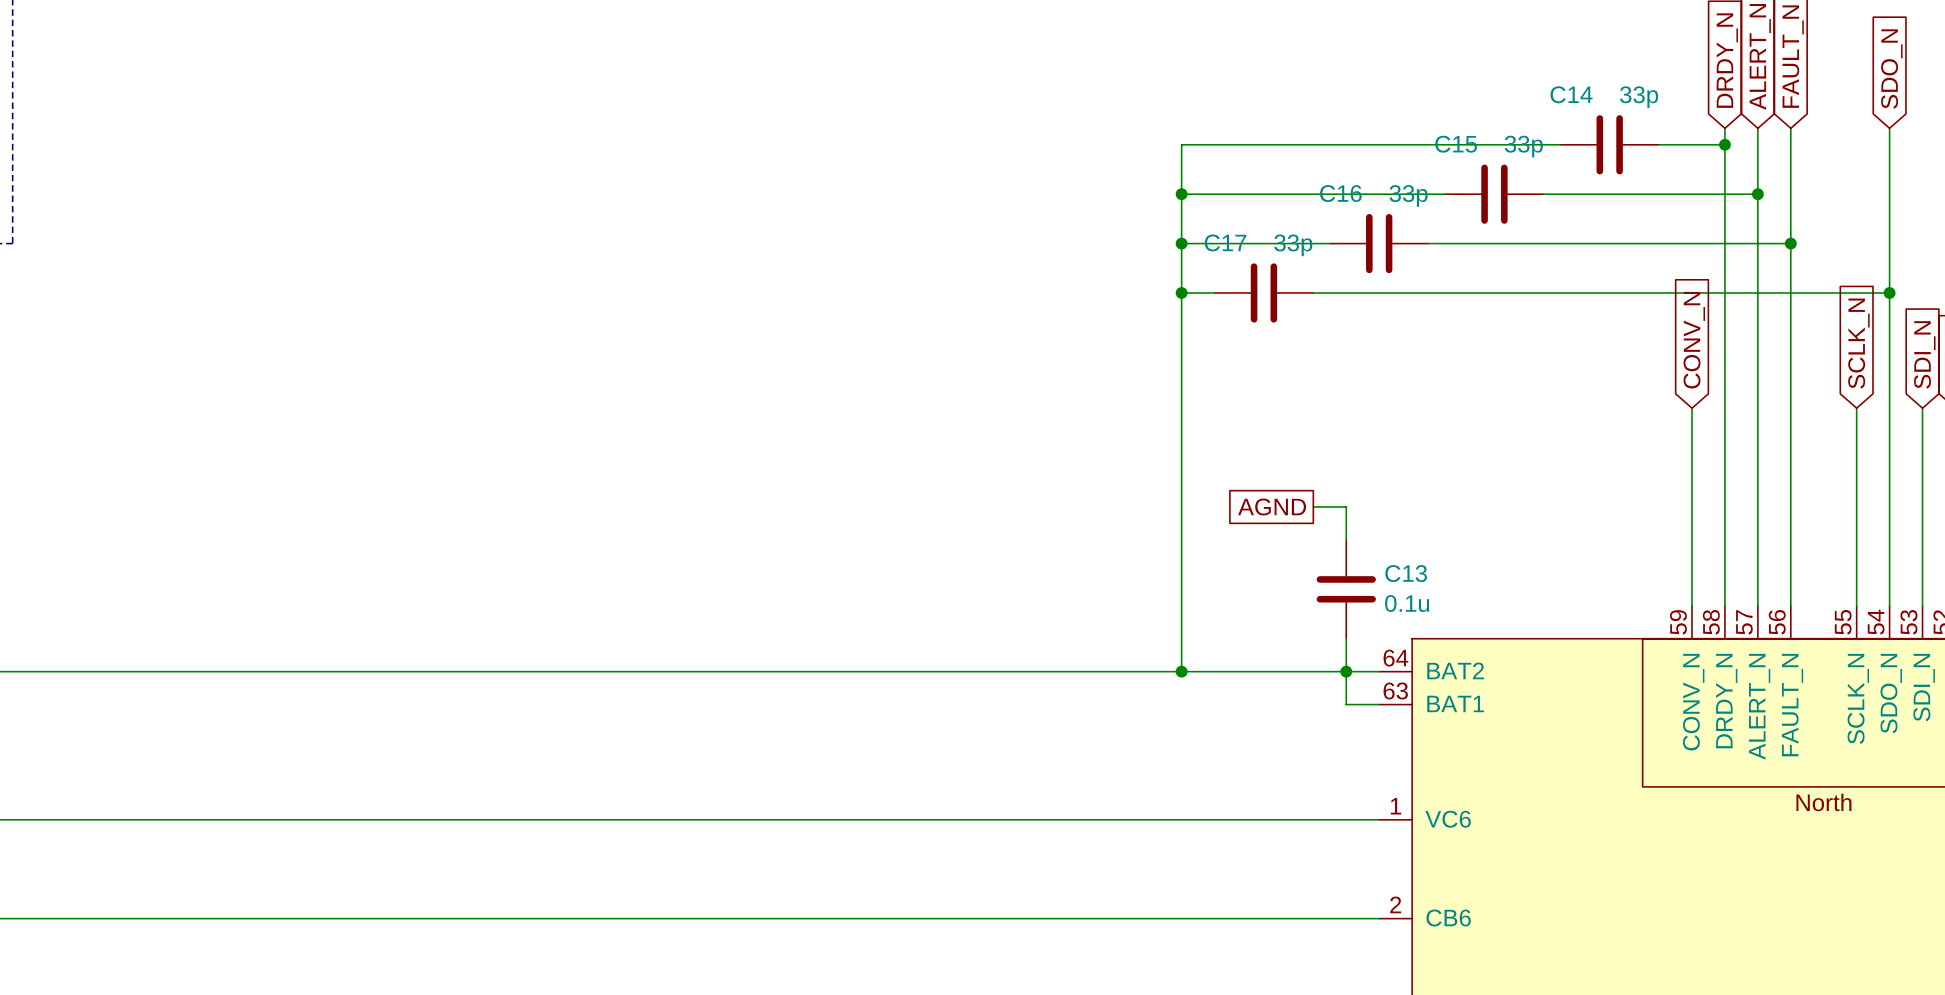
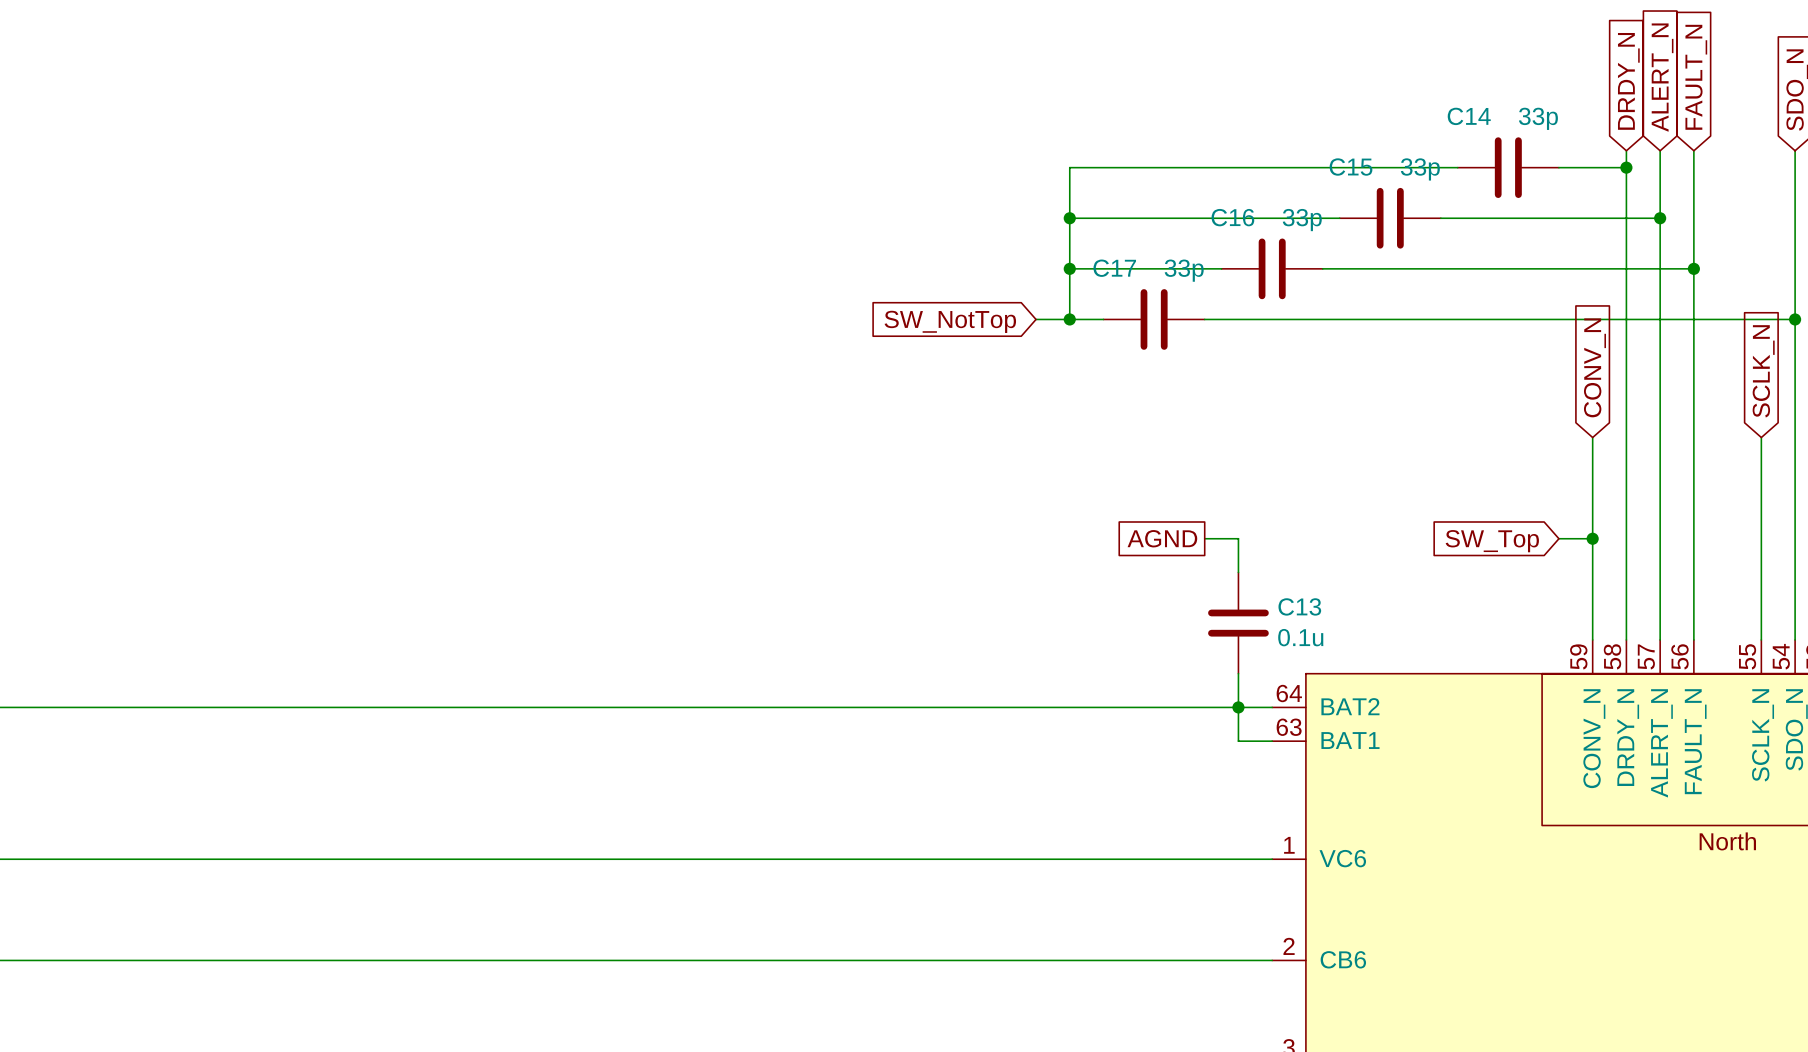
wire: (1181, 292) (1181, 671) -> (1069, 319) (1036, 319)
global label: none -> SW_NotTop (950, 321)
wire: none -> (1558, 538) (1592, 538)
junction: none -> (1592, 538)
global label: none -> SW_Top (1492, 541)
junction: (1181, 671) -> none

